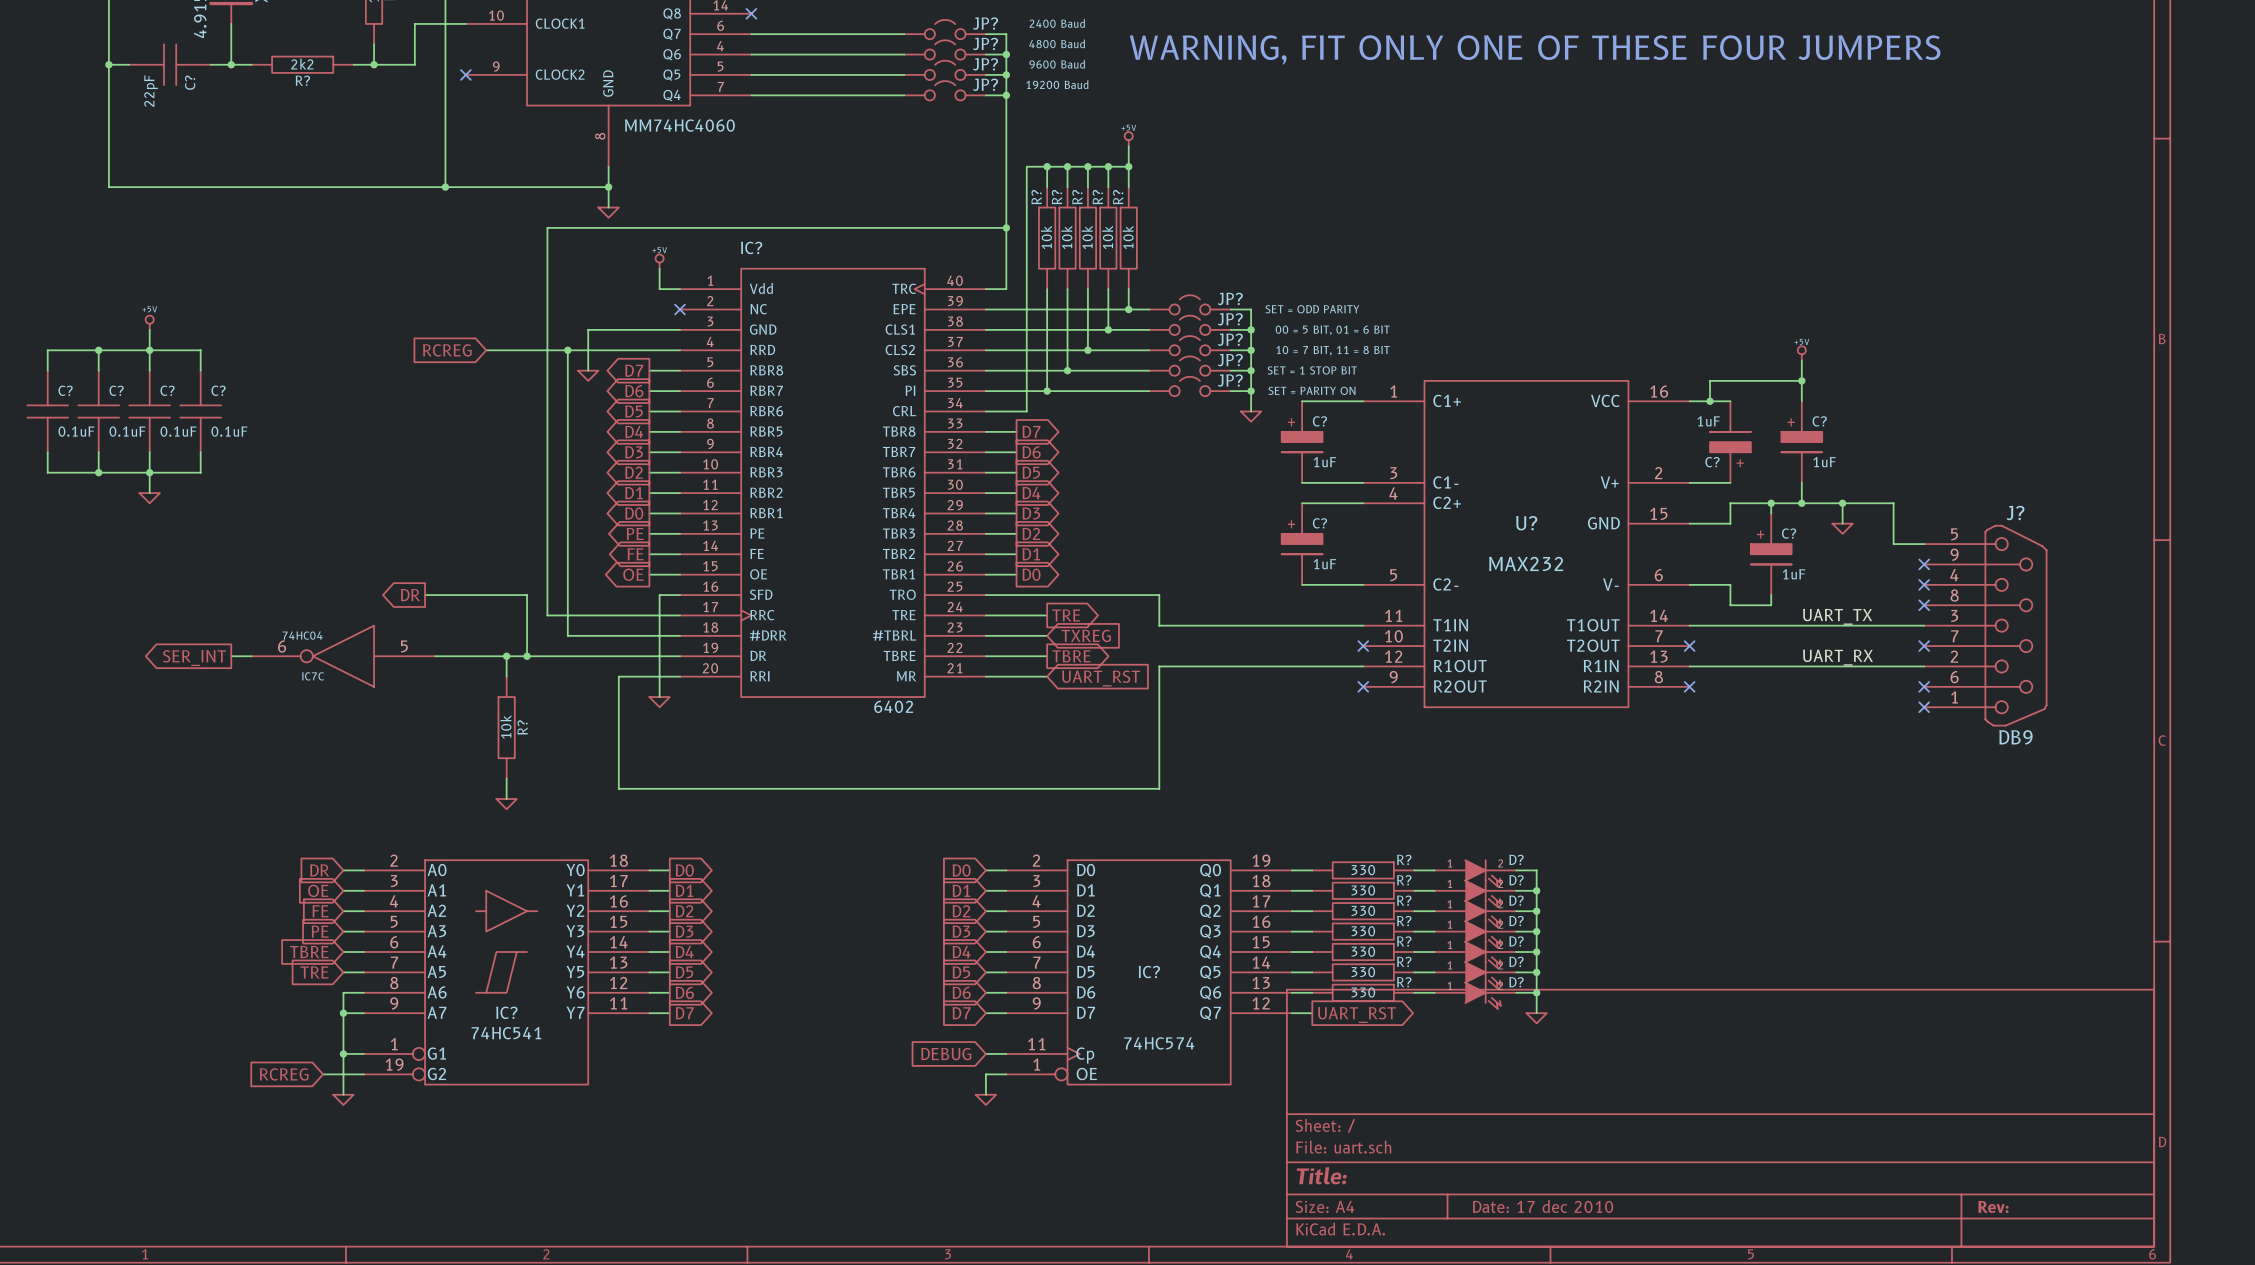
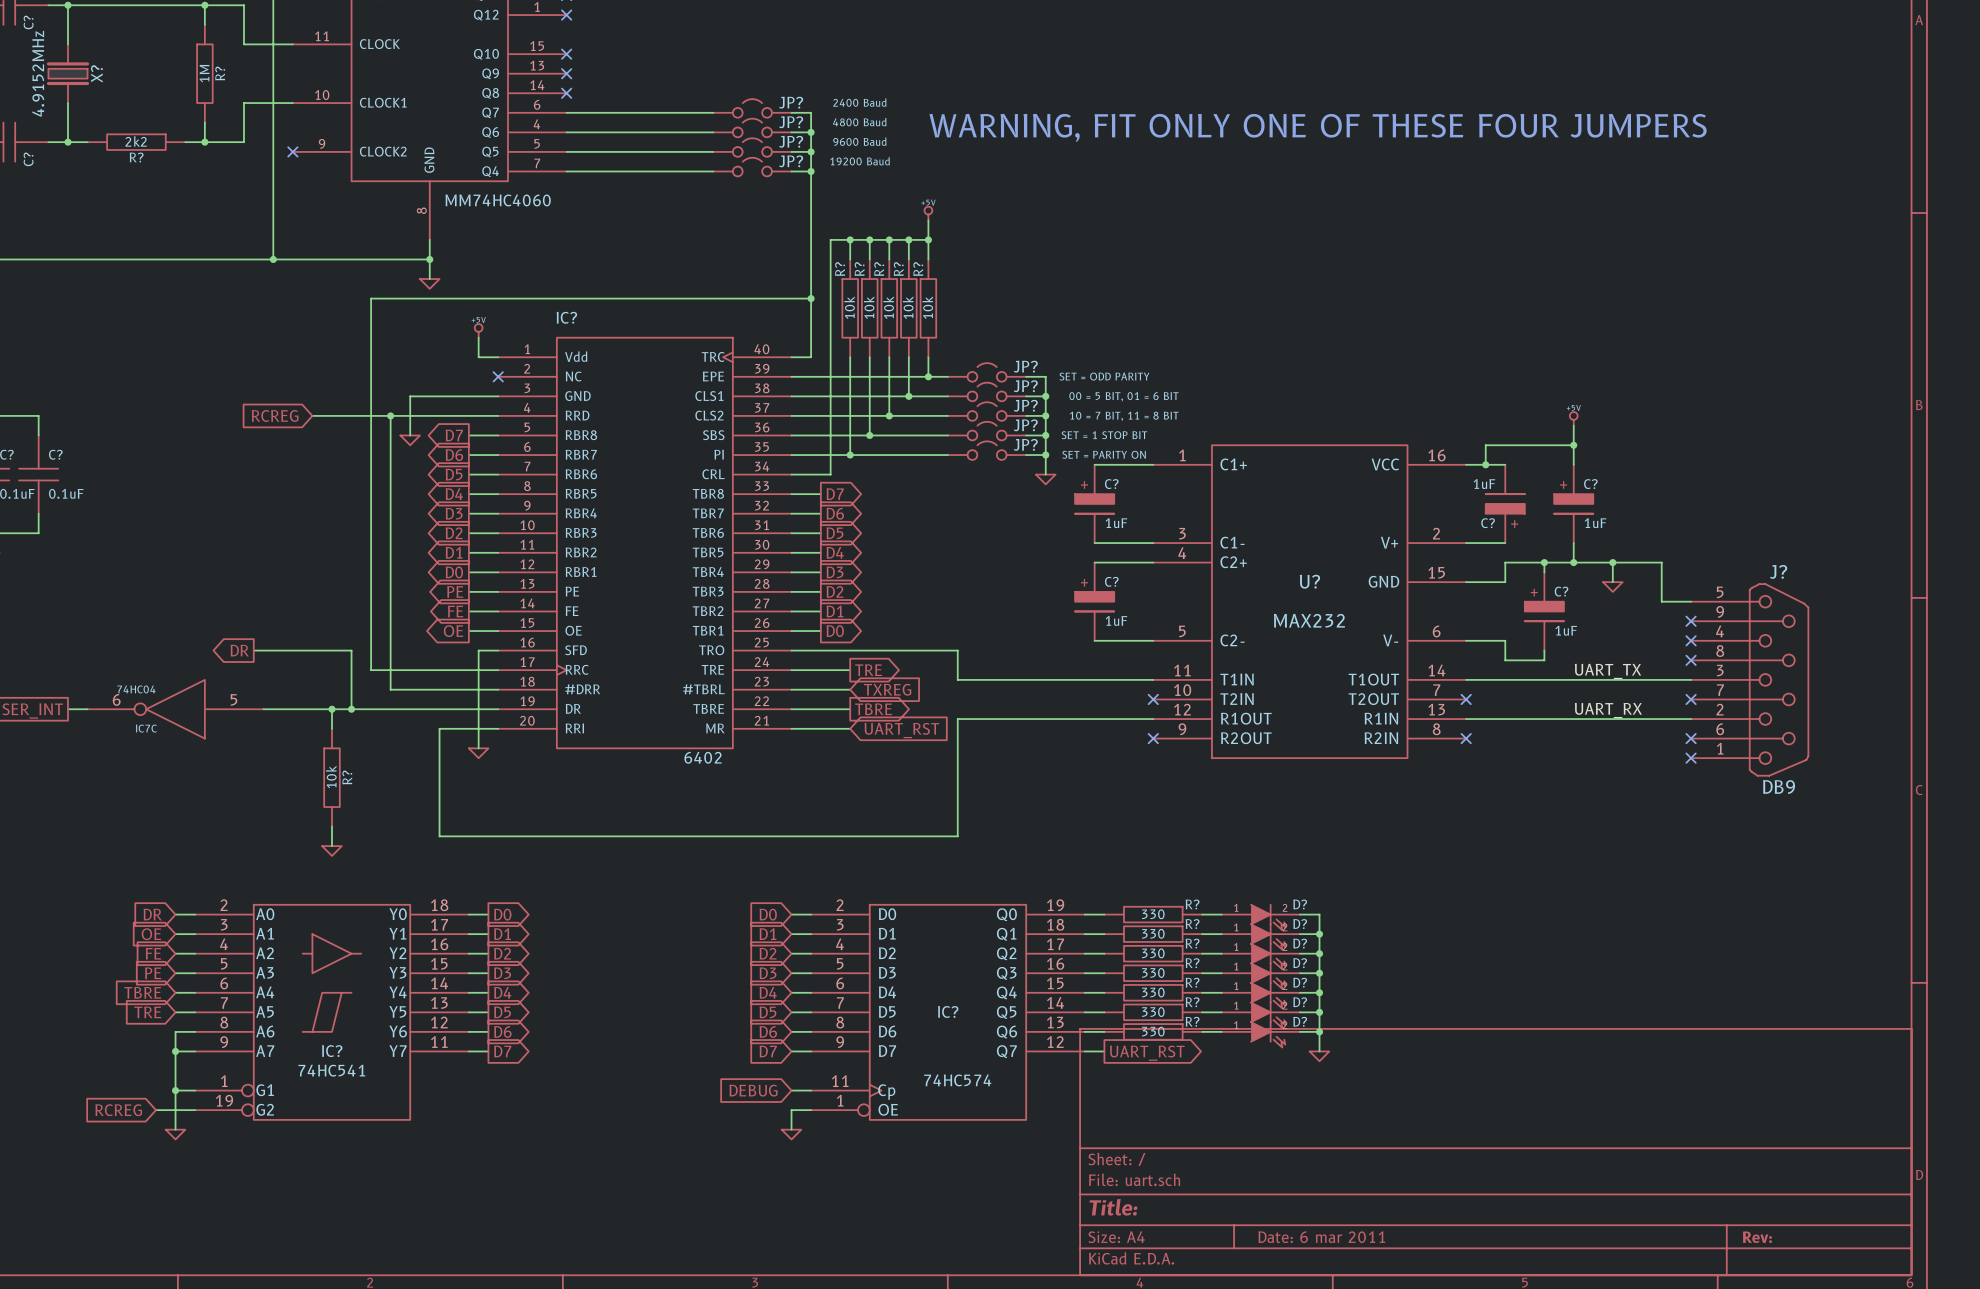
title block: Date: 17 dec 2010 (1543, 1206) -> Date: 6 mar 2011 (1321, 1237)

